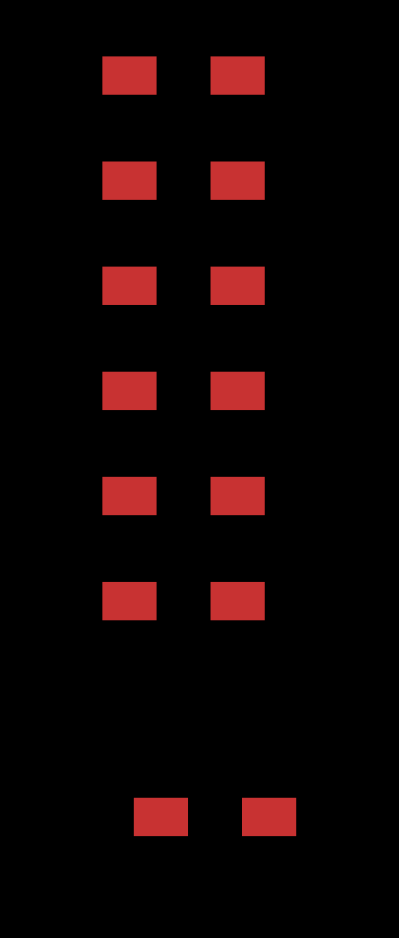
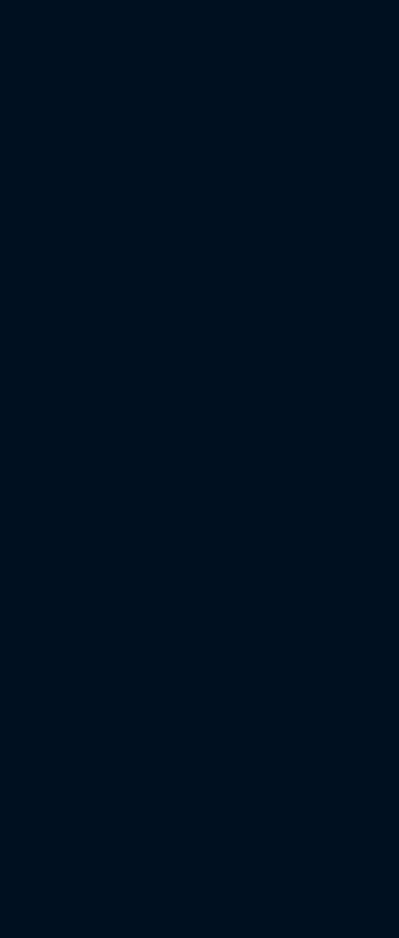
part: (183, 75) -> none
part: (183, 180) -> none
part: (183, 285) -> none
part: (183, 390) -> none
part: (183, 496) -> none
part: (183, 601) -> none
part: (215, 816) -> none

